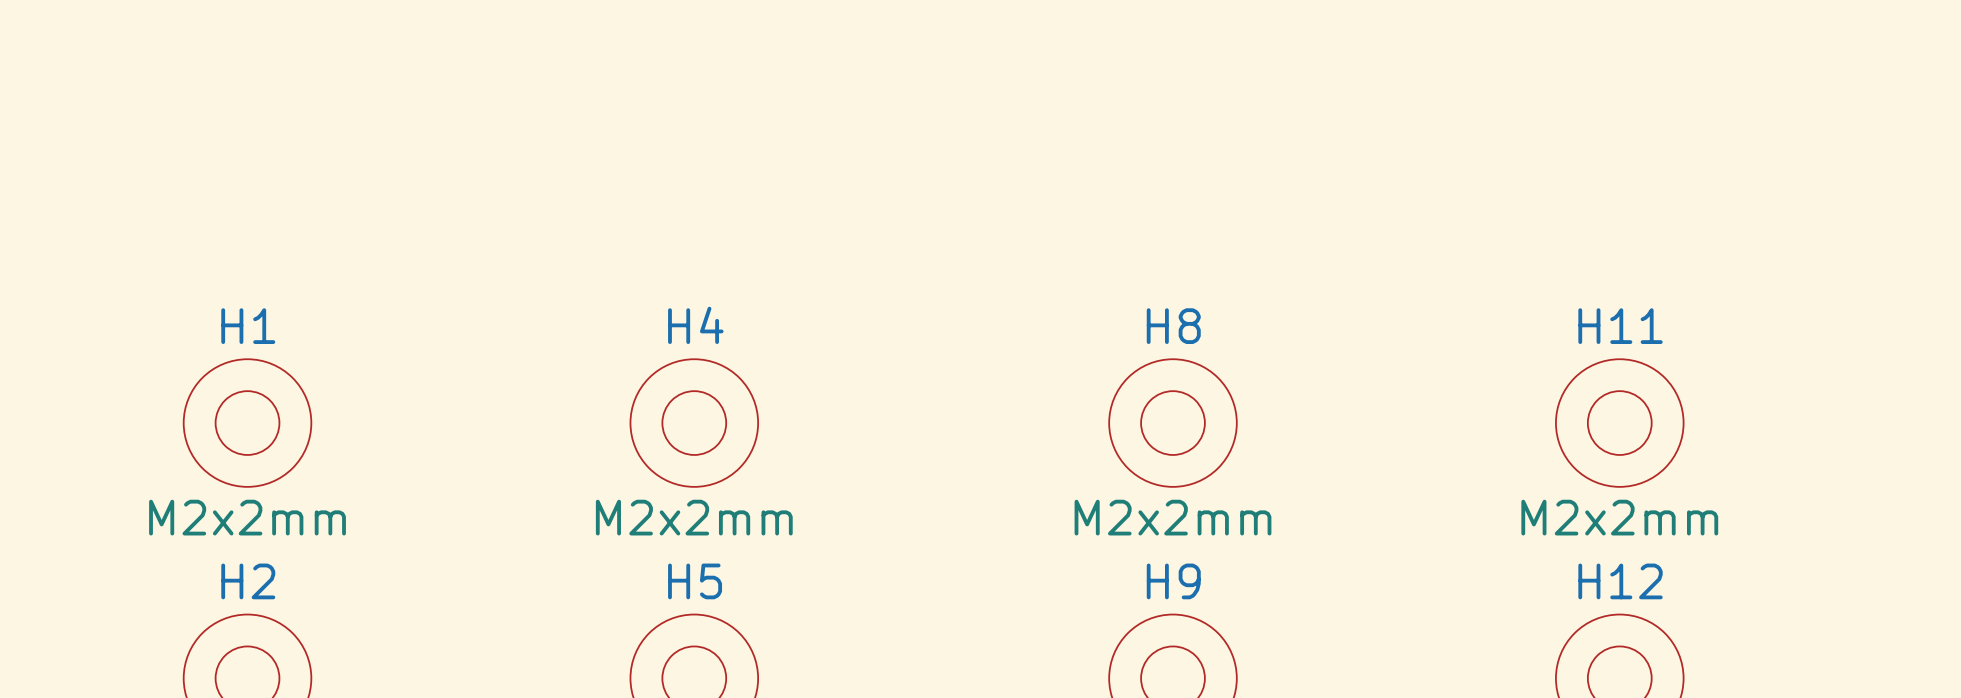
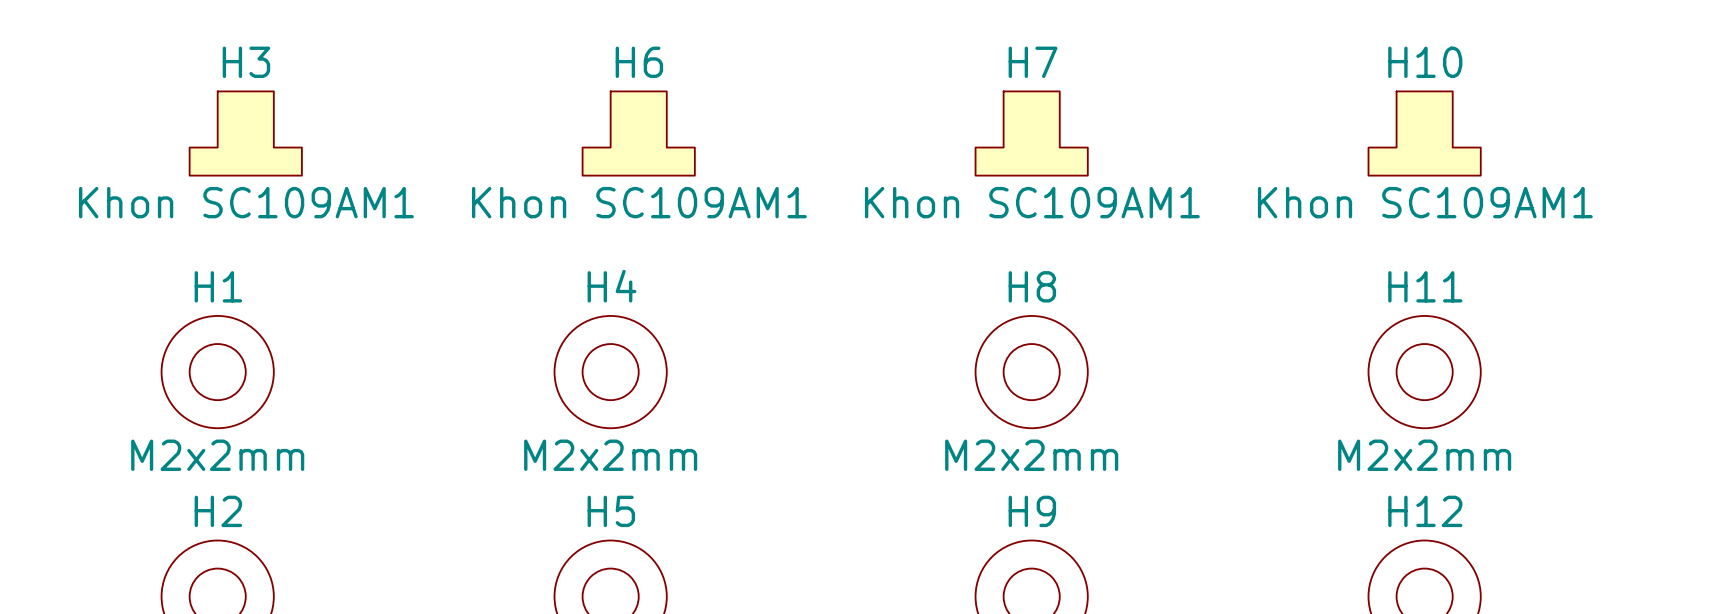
H3: none -> Khon SC109AM1 (245, 133)
H6: none -> Khon SC109AM1 (638, 133)
H7: none -> Khon SC109AM1 (1031, 133)
H10: none -> Khon SC109AM1 (1424, 133)

